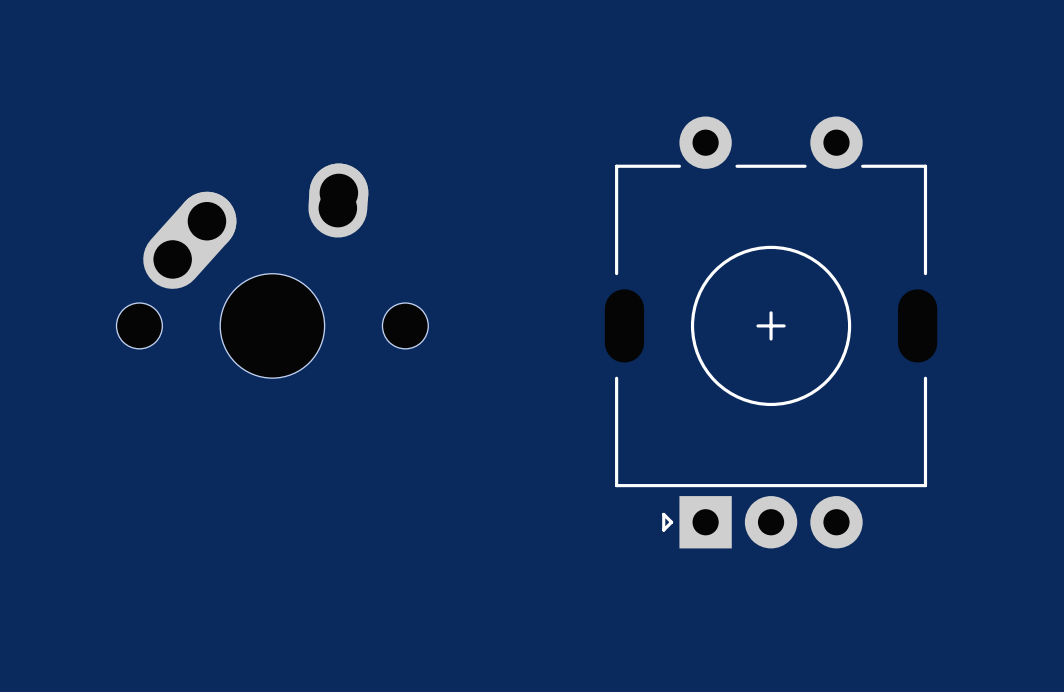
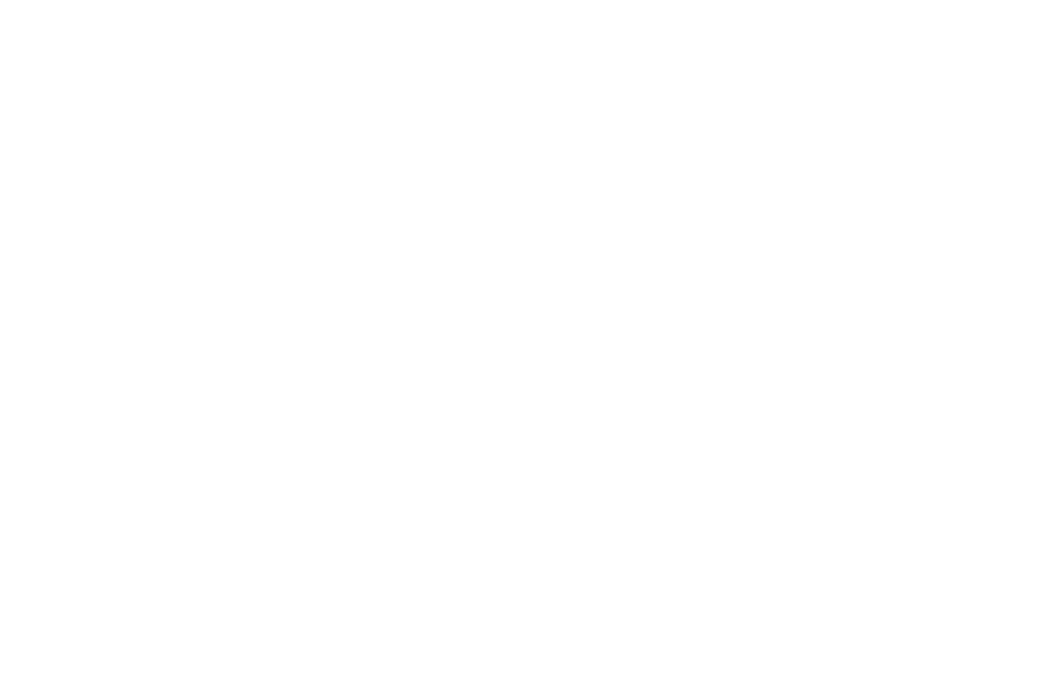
part: (272, 270) -> none
part: (771, 332) -> none

